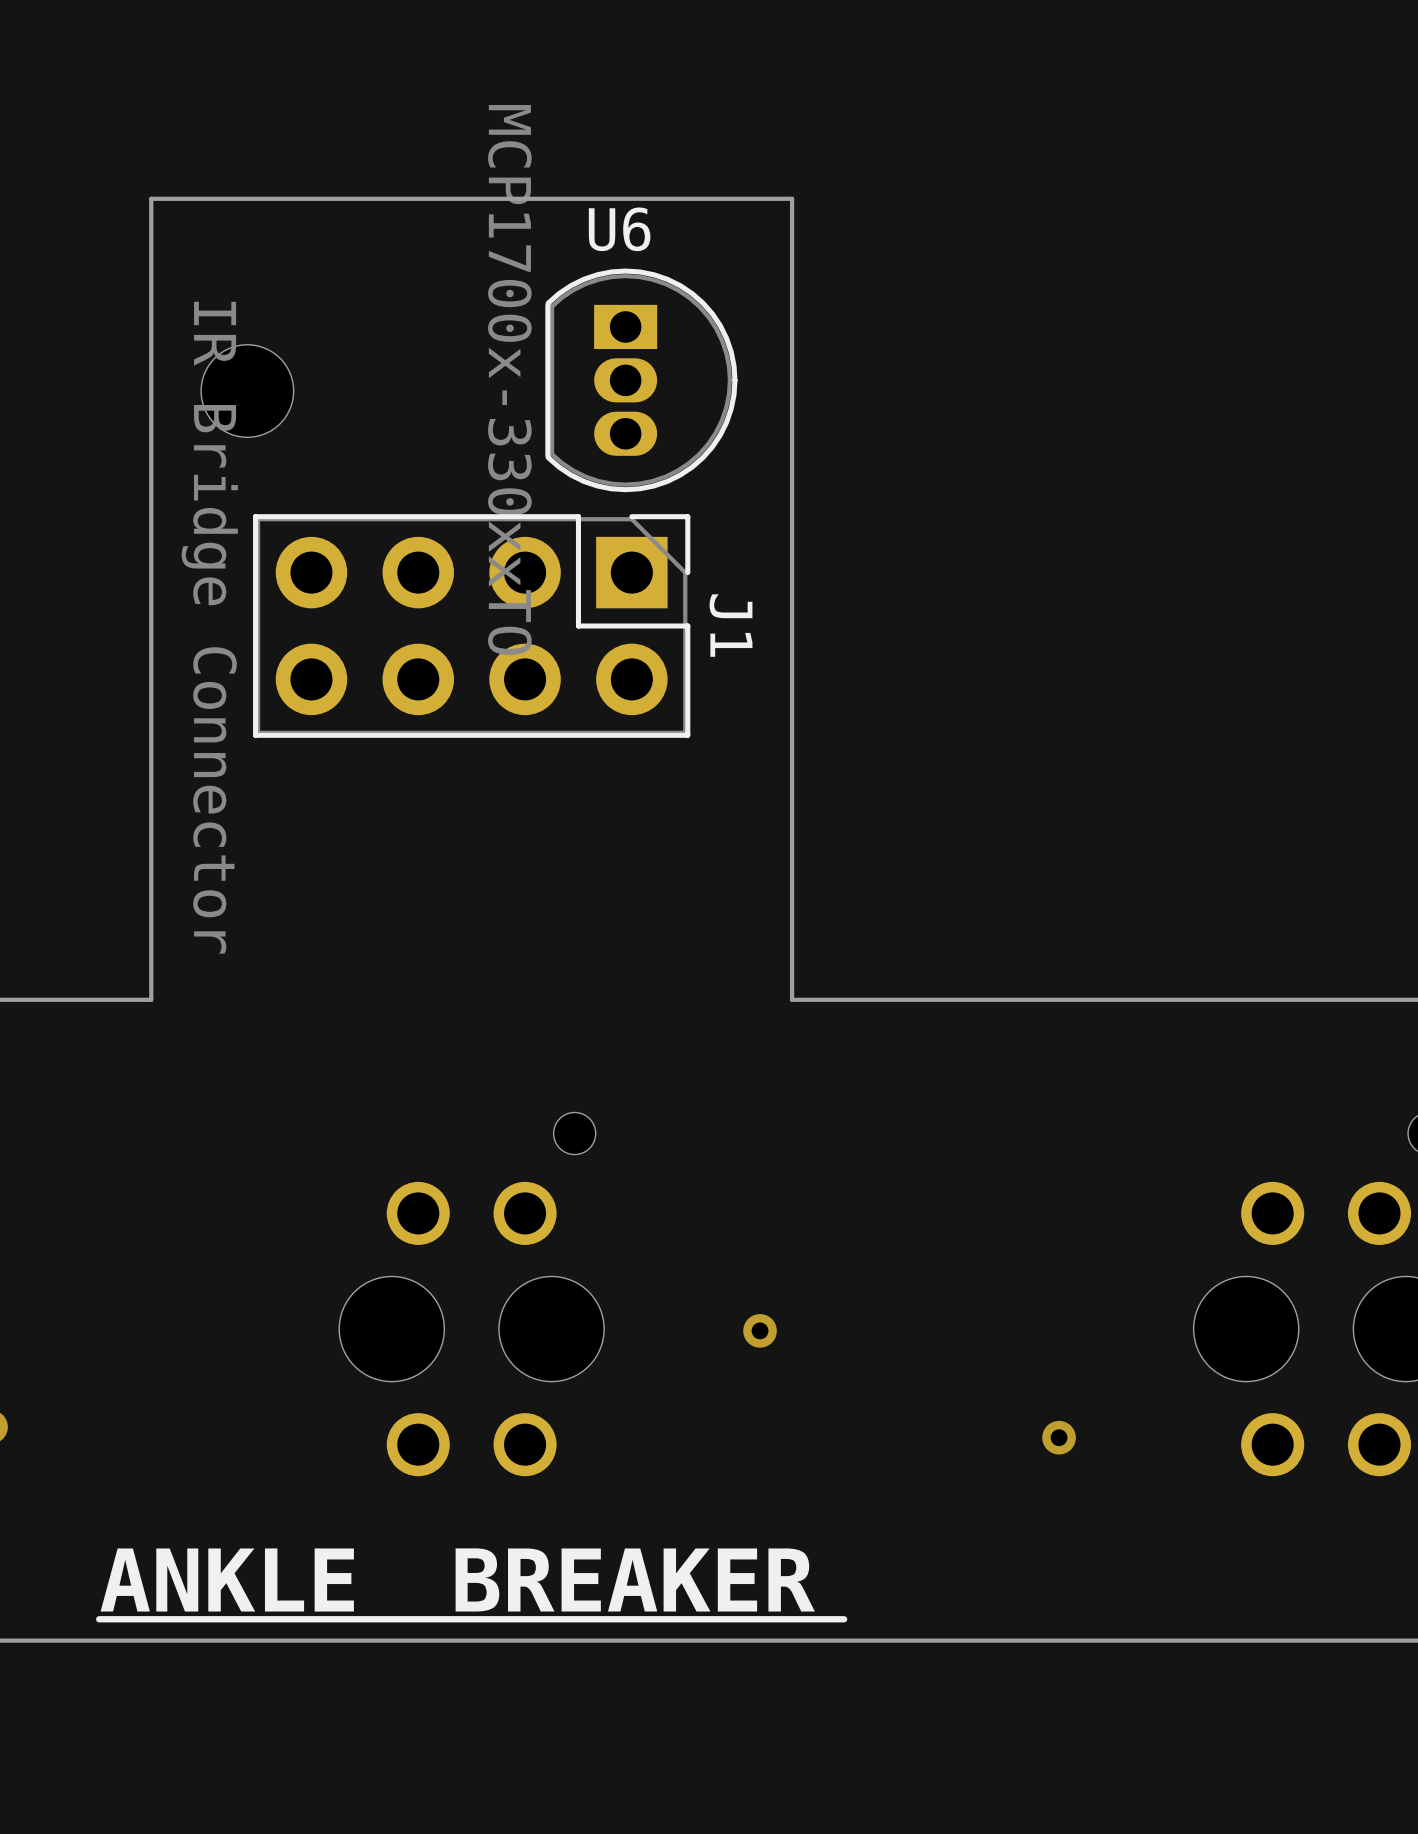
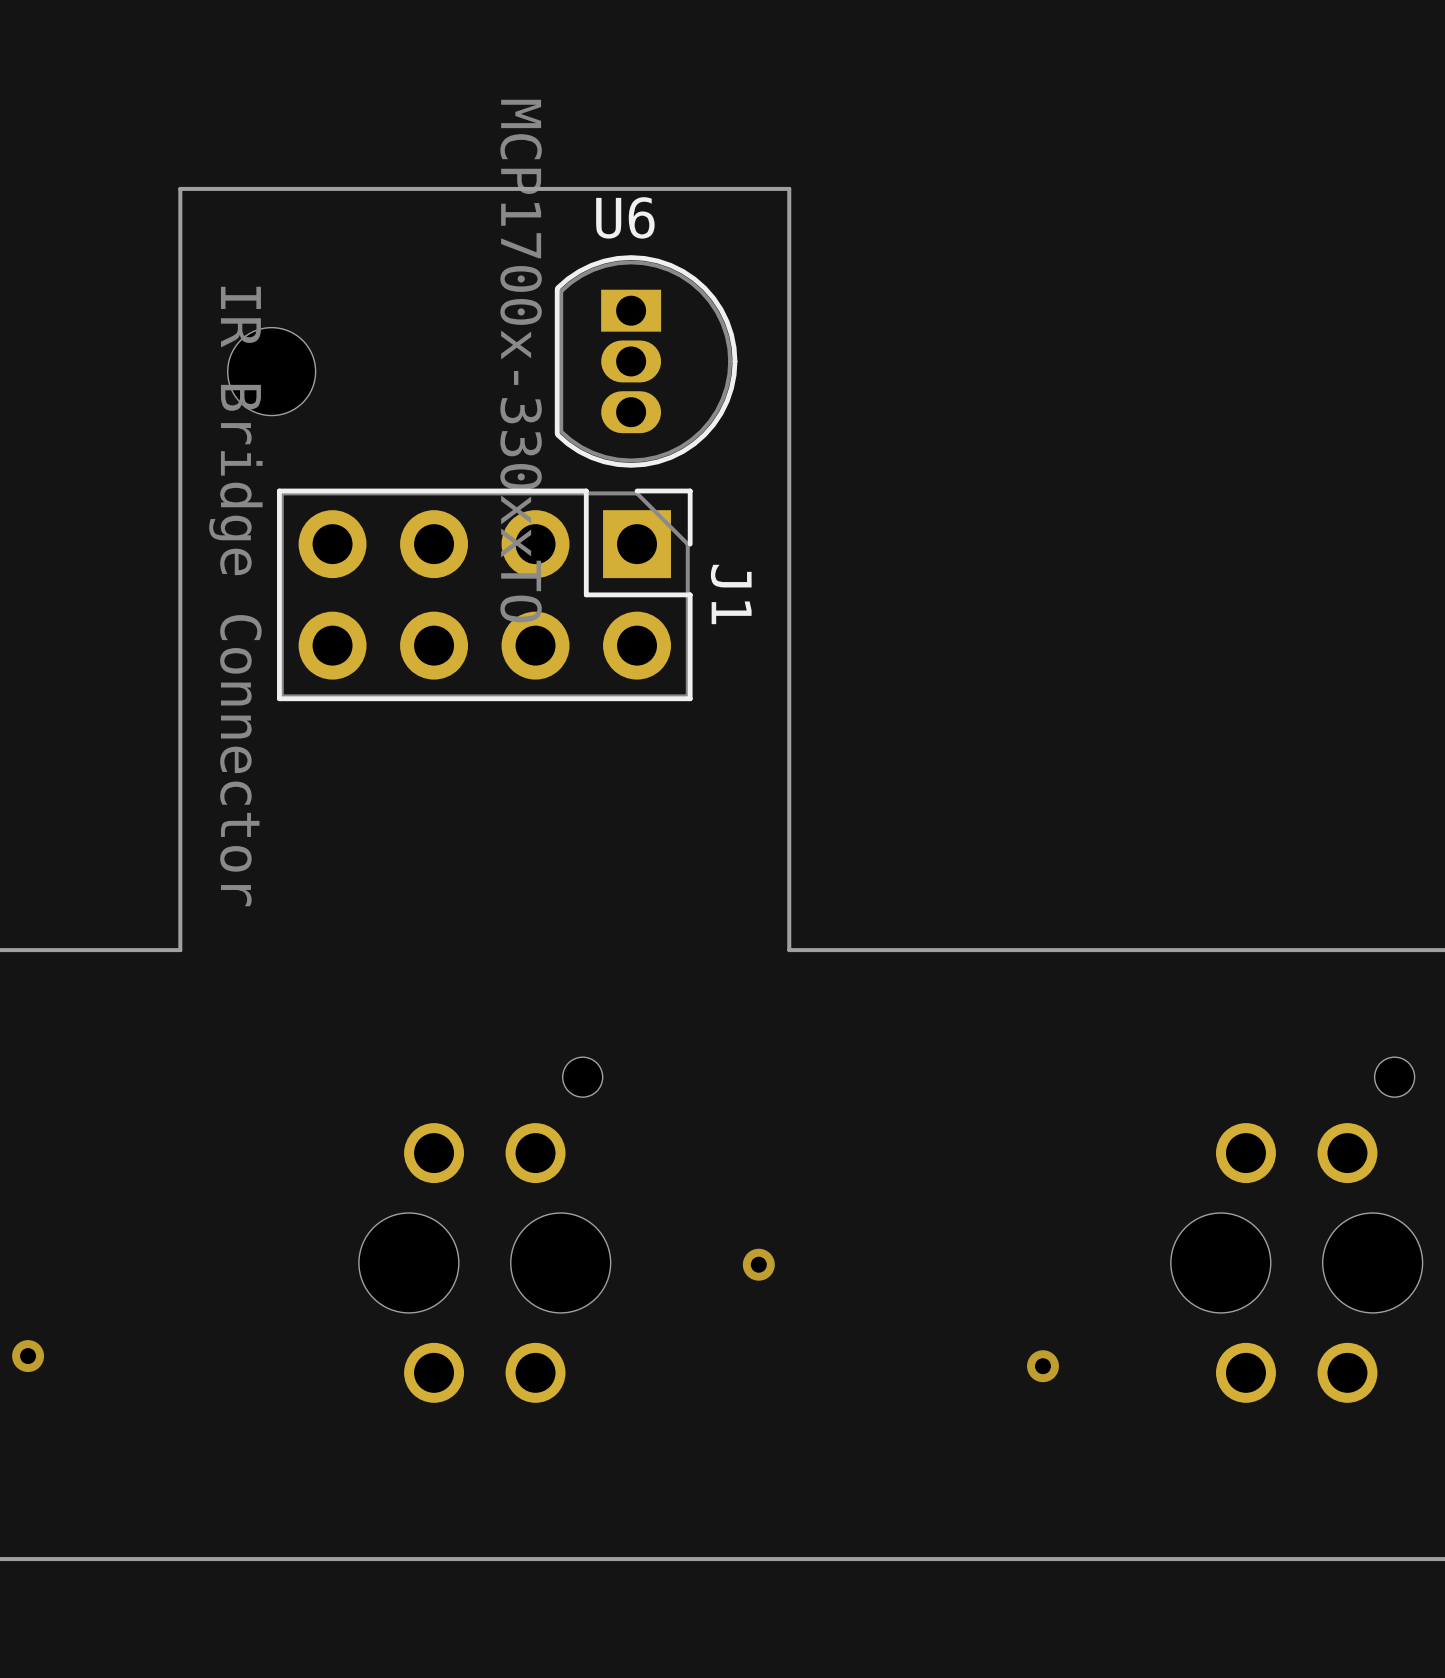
text: BREAKER (635, 1579) -> none
text: ANKLE (227, 1580) -> none
line: (844, 1619) (99, 1619) -> none

